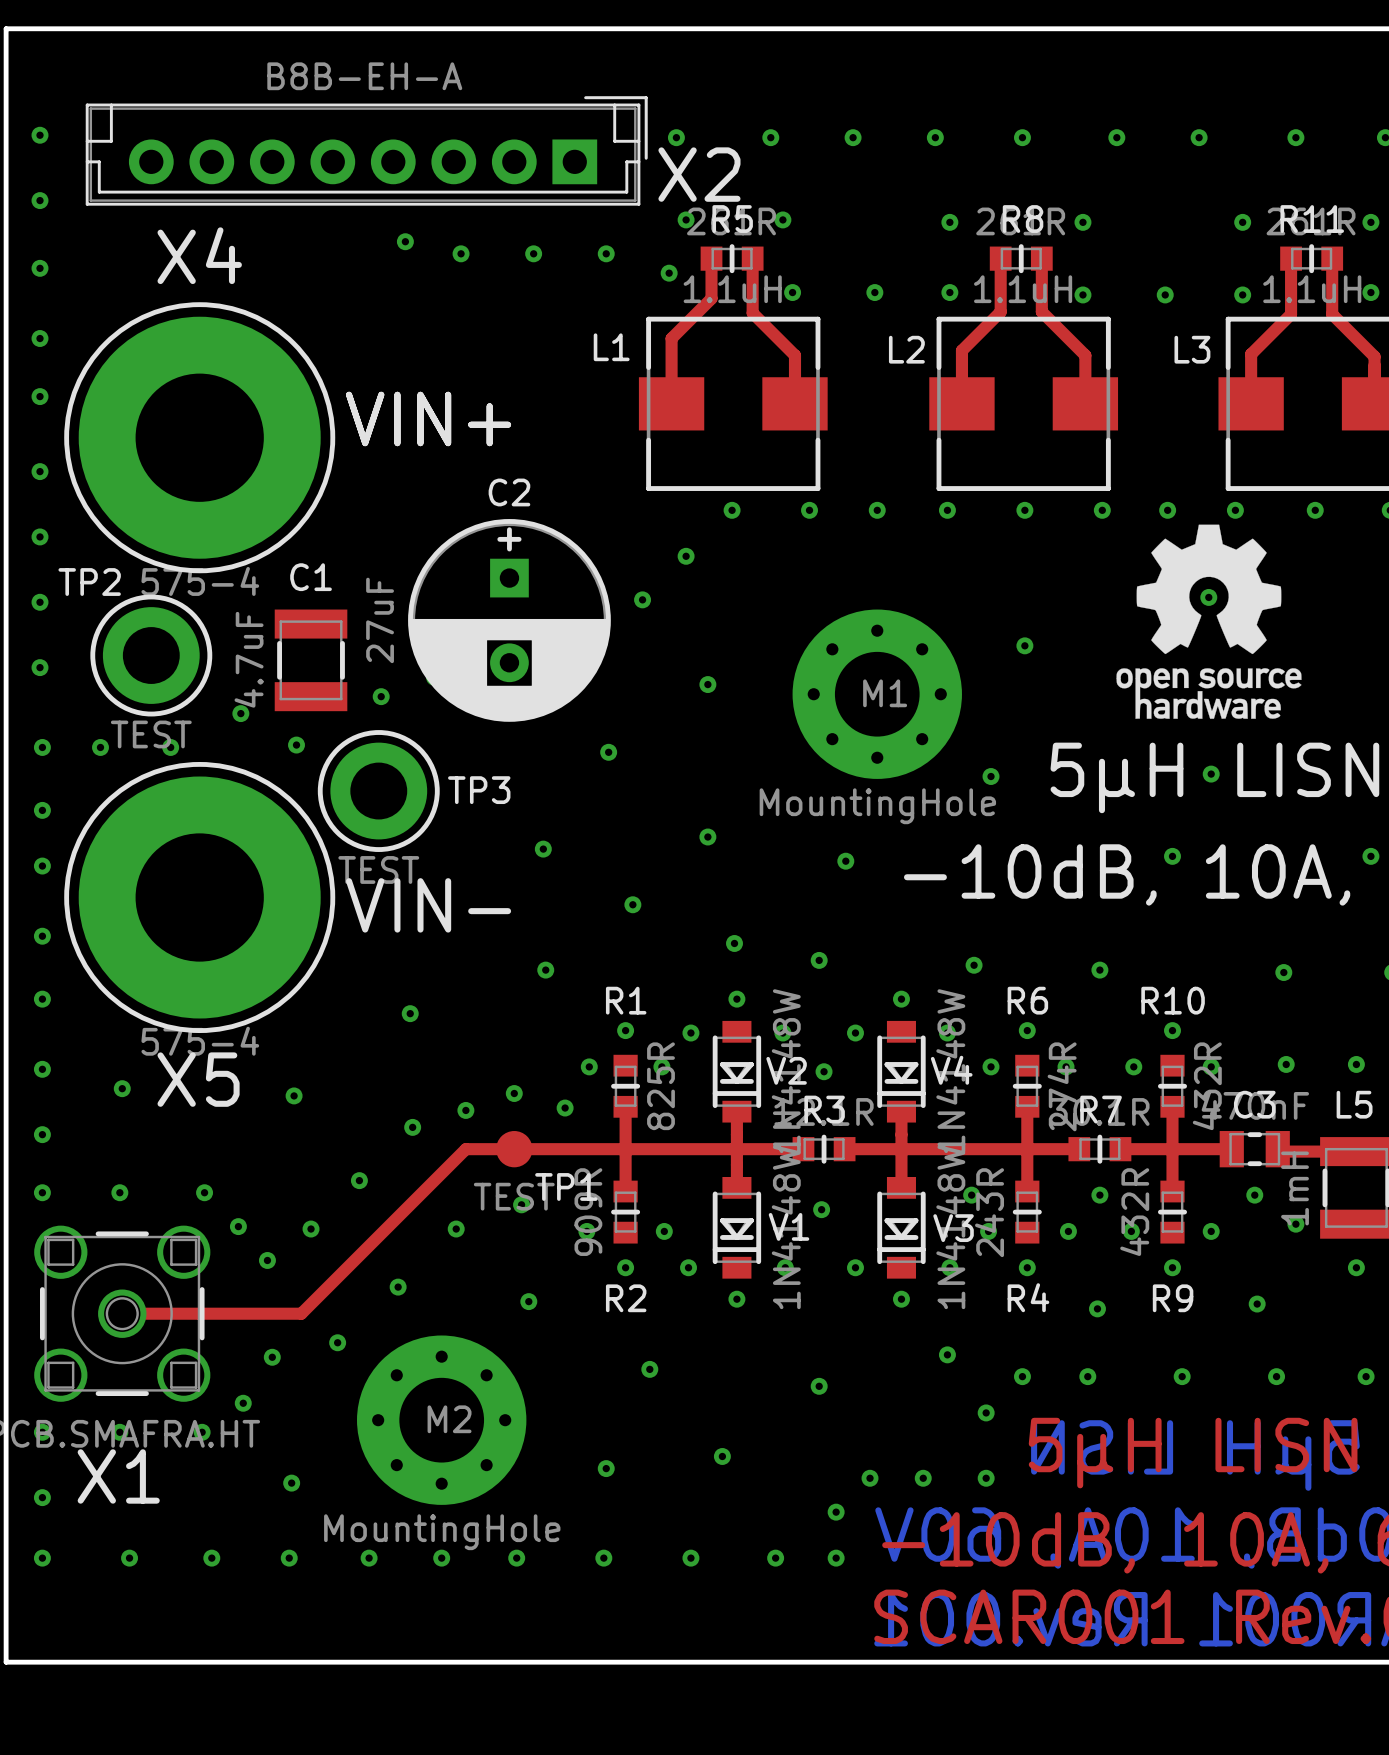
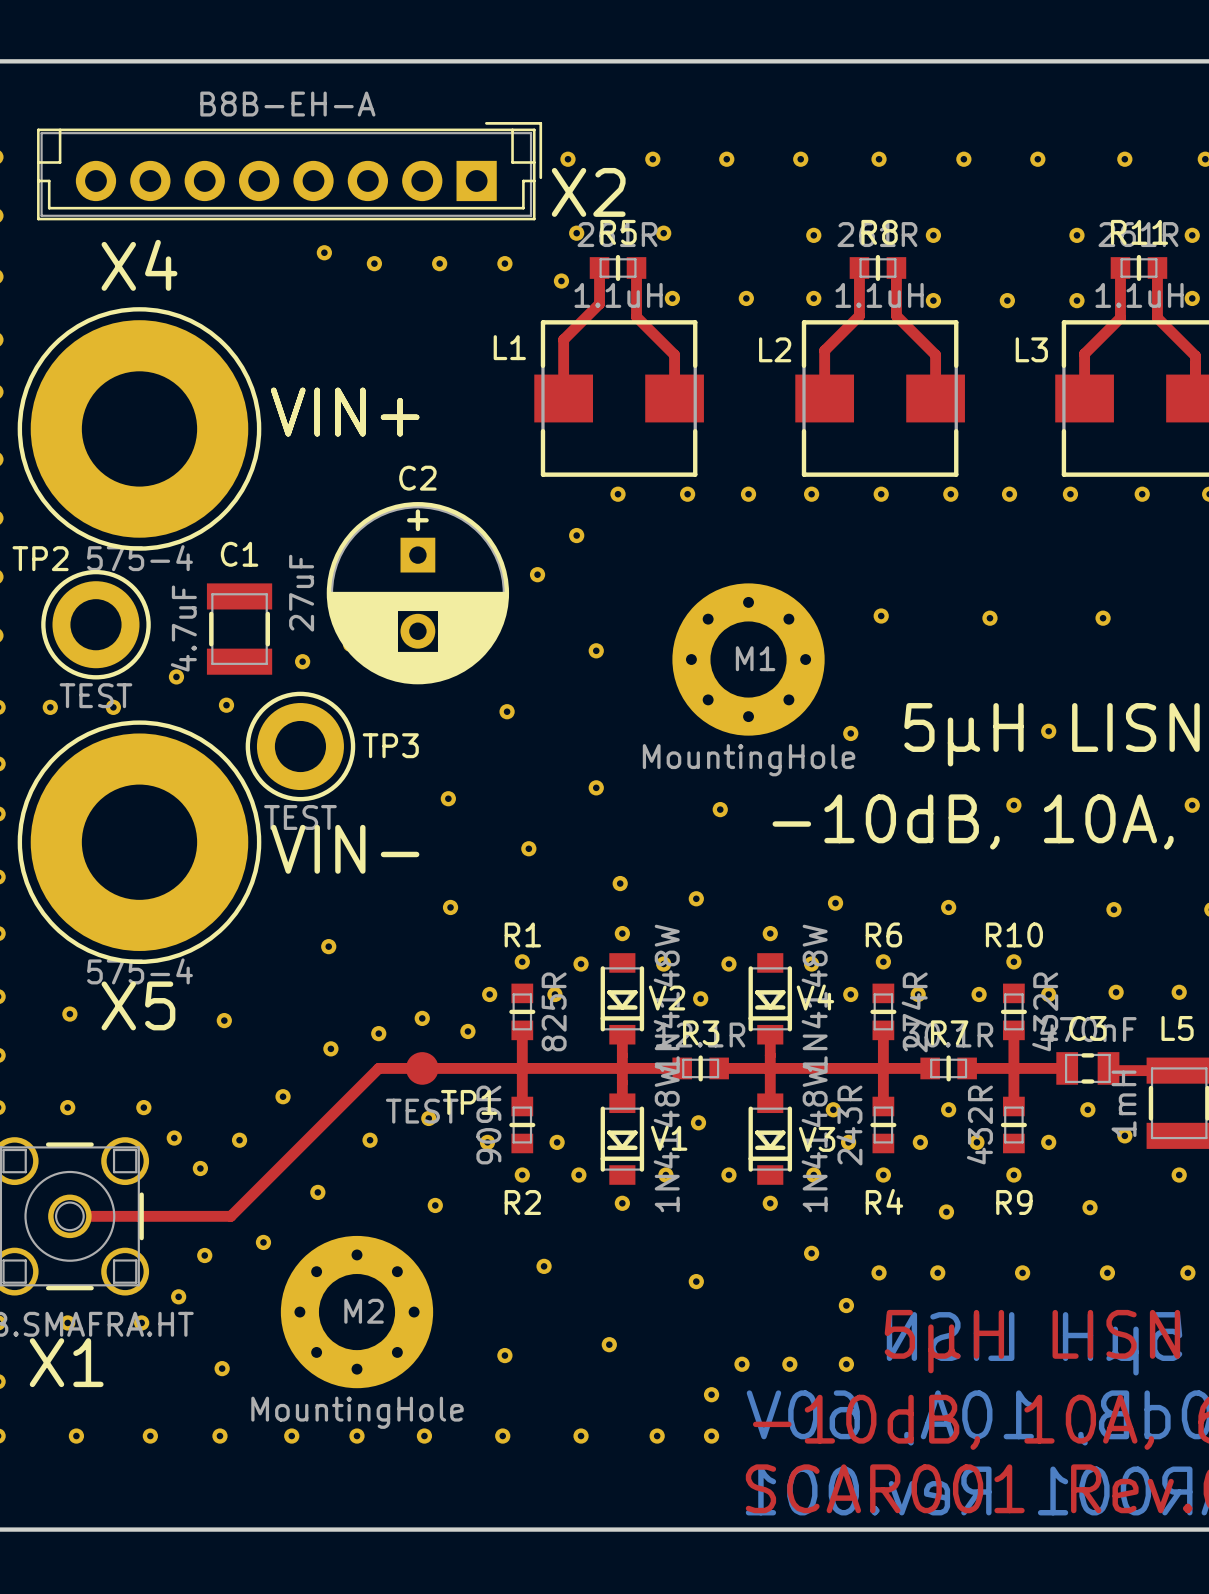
drawing: [1116, 524, 1302, 719] -> none
part: (1208, 597) -> none
part: none -> (989, 618)
part: none -> (1103, 618)

